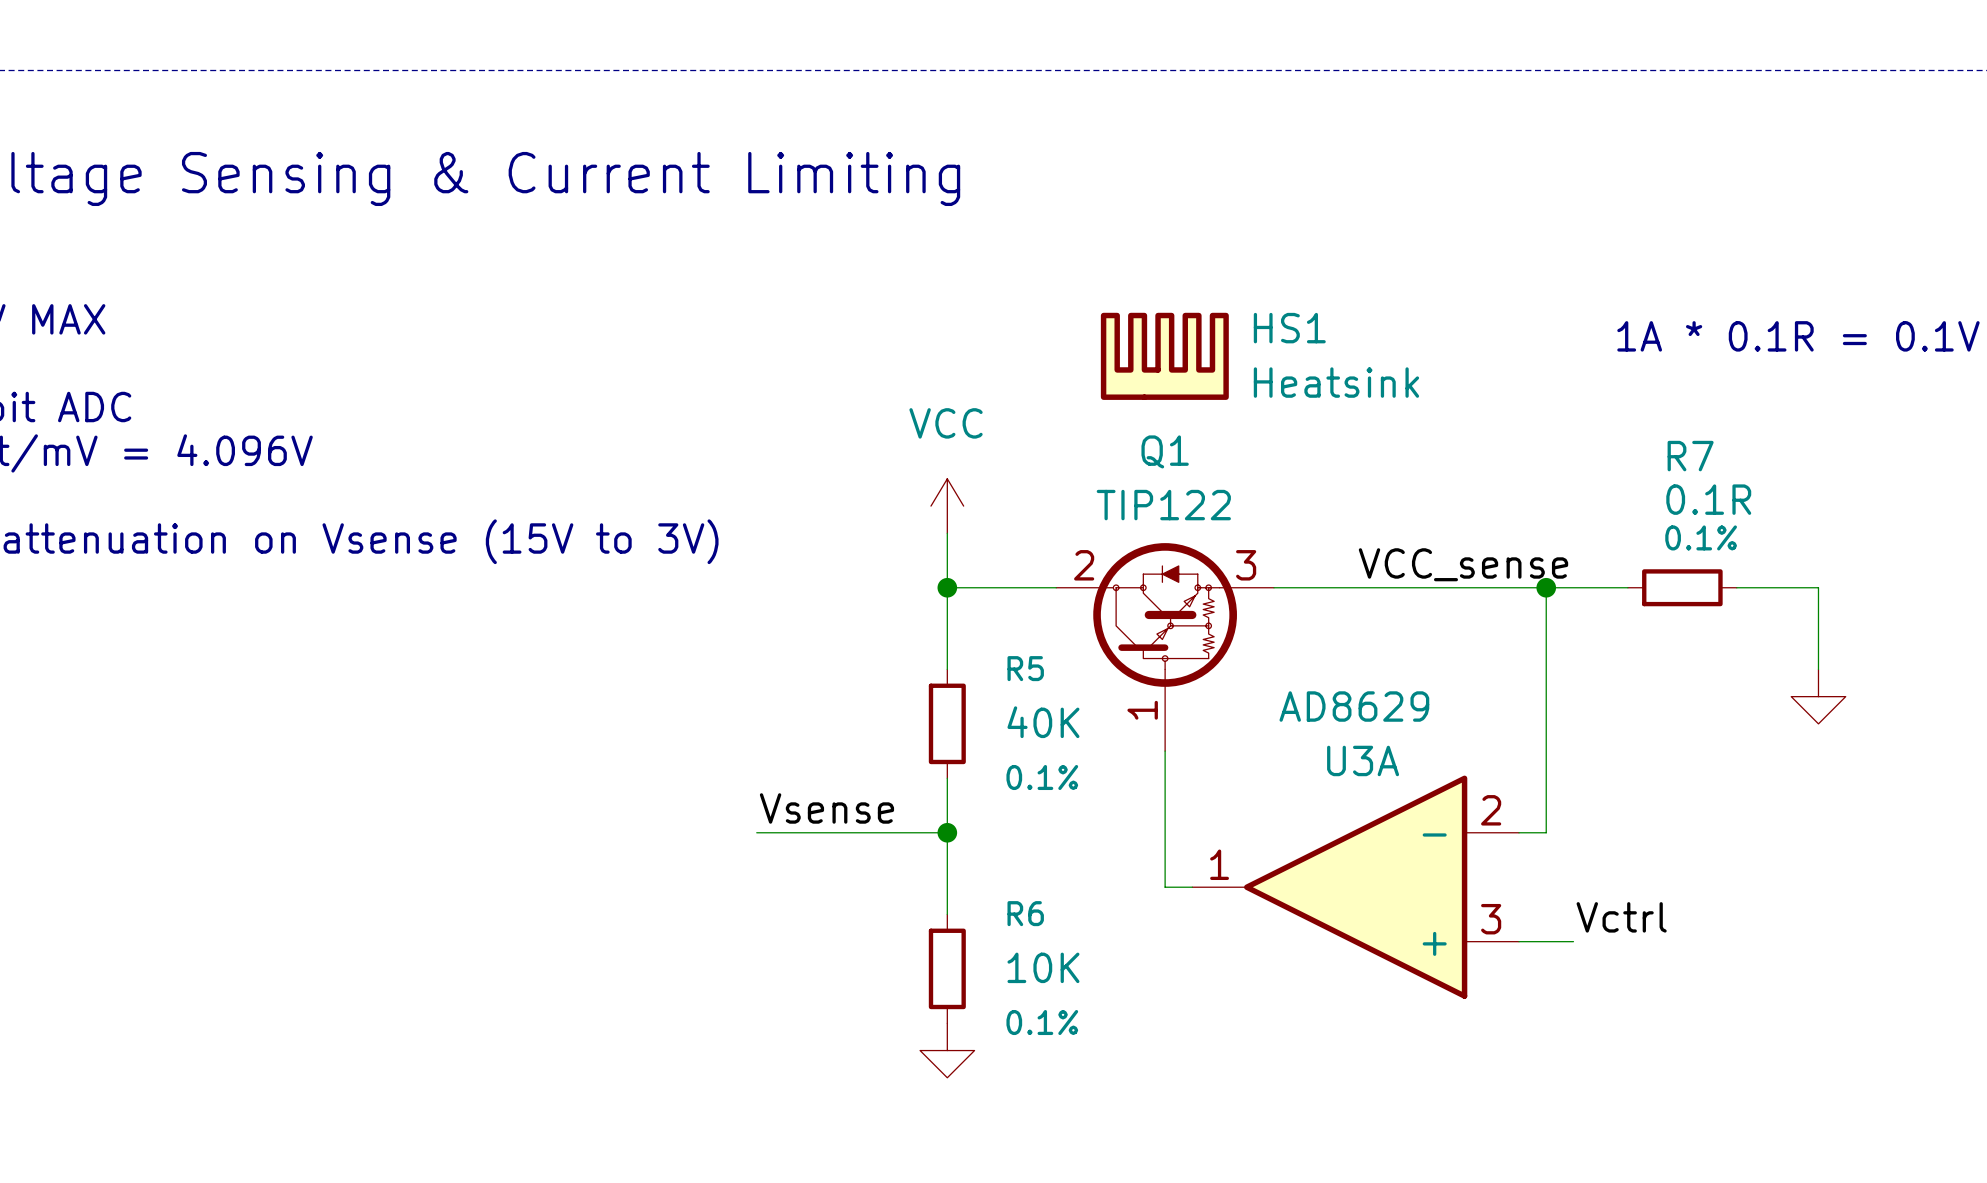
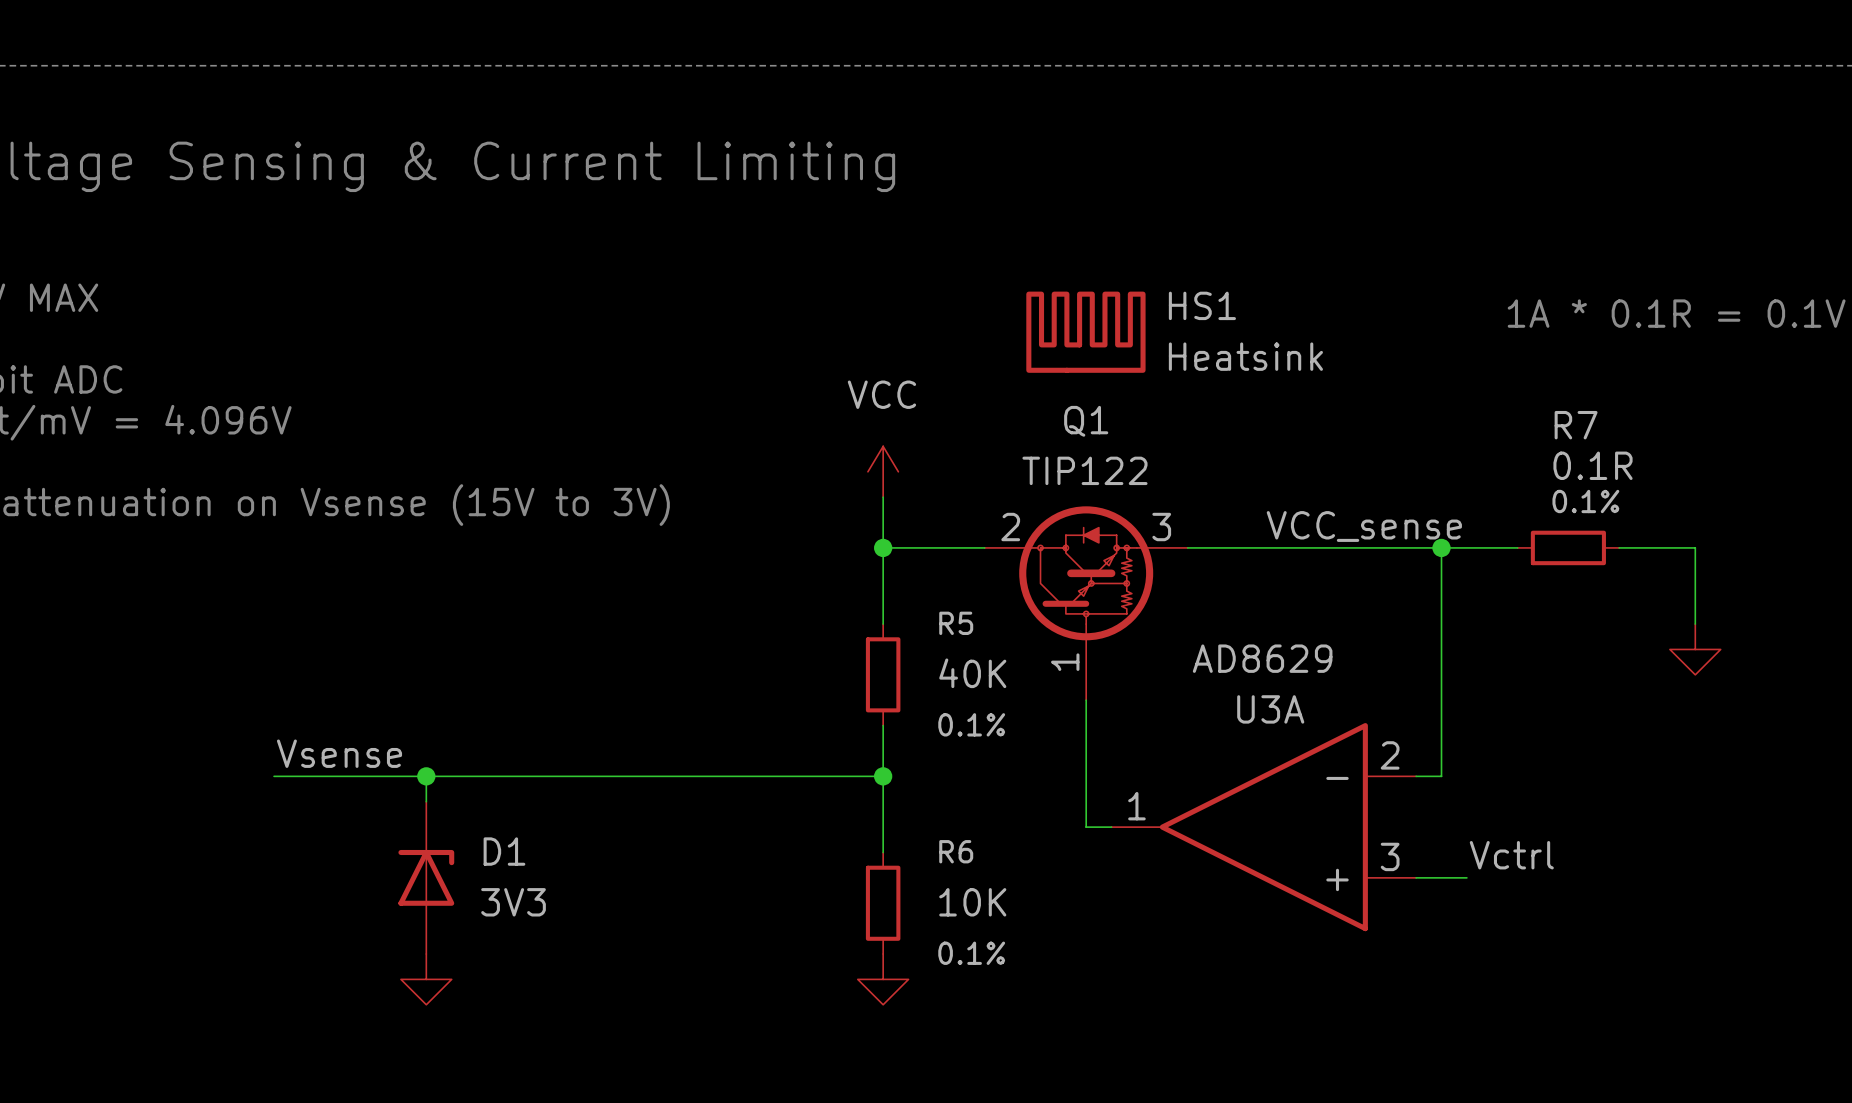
label position: Vsense (826, 808) -> Vsense (339, 753)
wire: none -> (274, 776) (705, 776)
wire: none -> (426, 776) (426, 801)
junction: none -> (426, 776)
D1: none -> (426, 877)
power symbol: none -> (426, 979)

